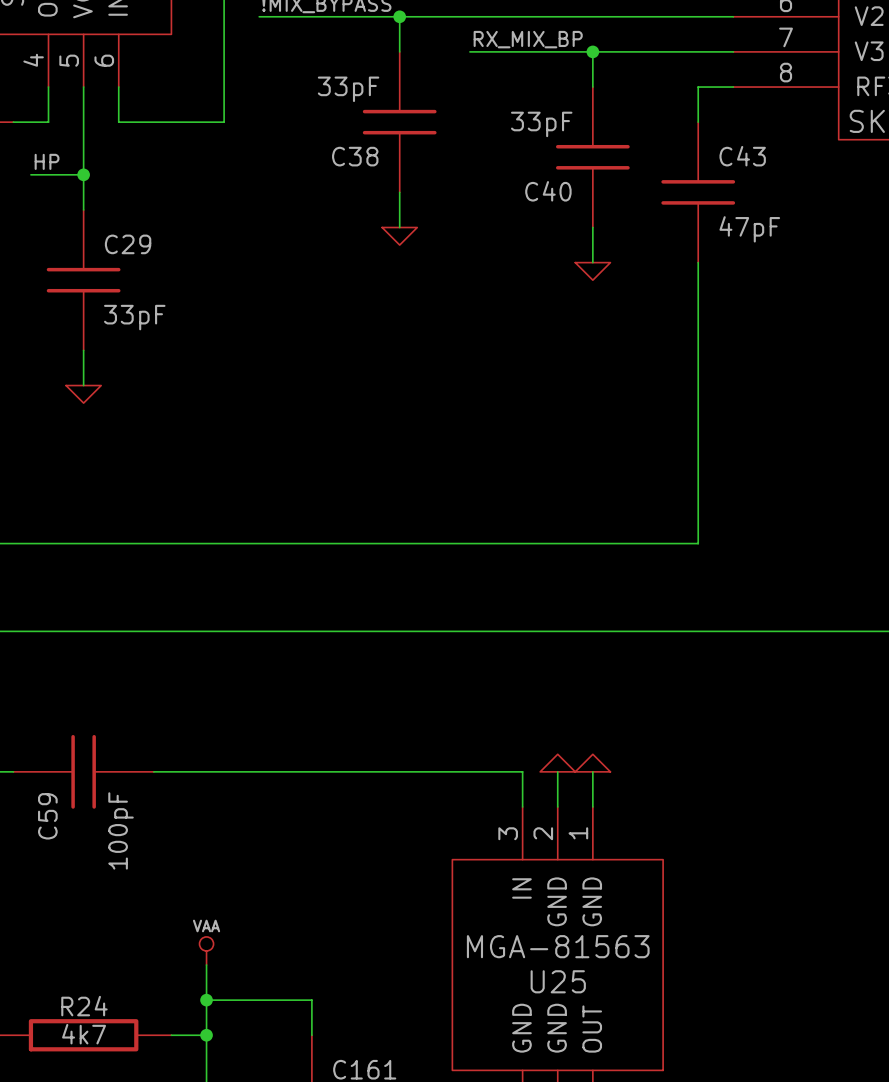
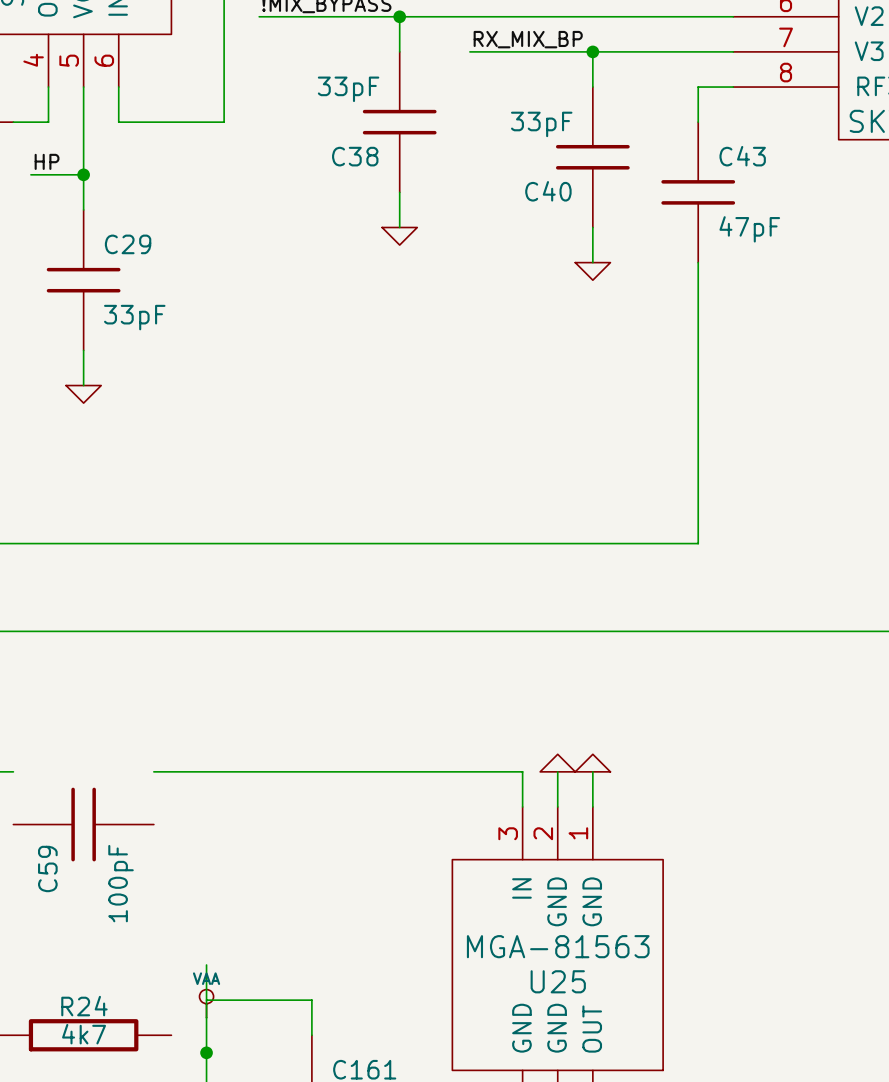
C59 position: (83, 771) -> (83, 824)
power symbol position: VAA (206, 950) -> VAA (206, 1003)
junction: (206, 1000) -> none
wire: (171, 1035) (206, 1035) -> none
junction position: (206, 1035) -> (206, 1052)

